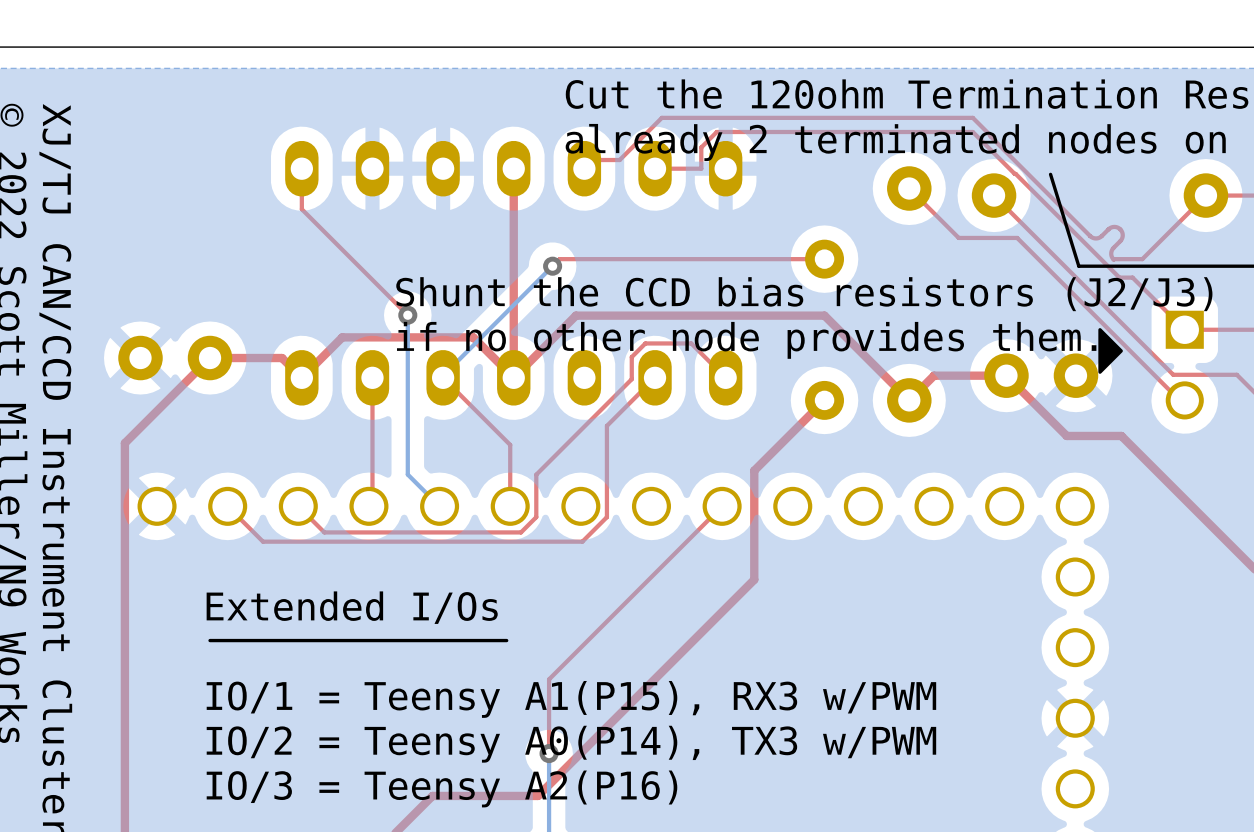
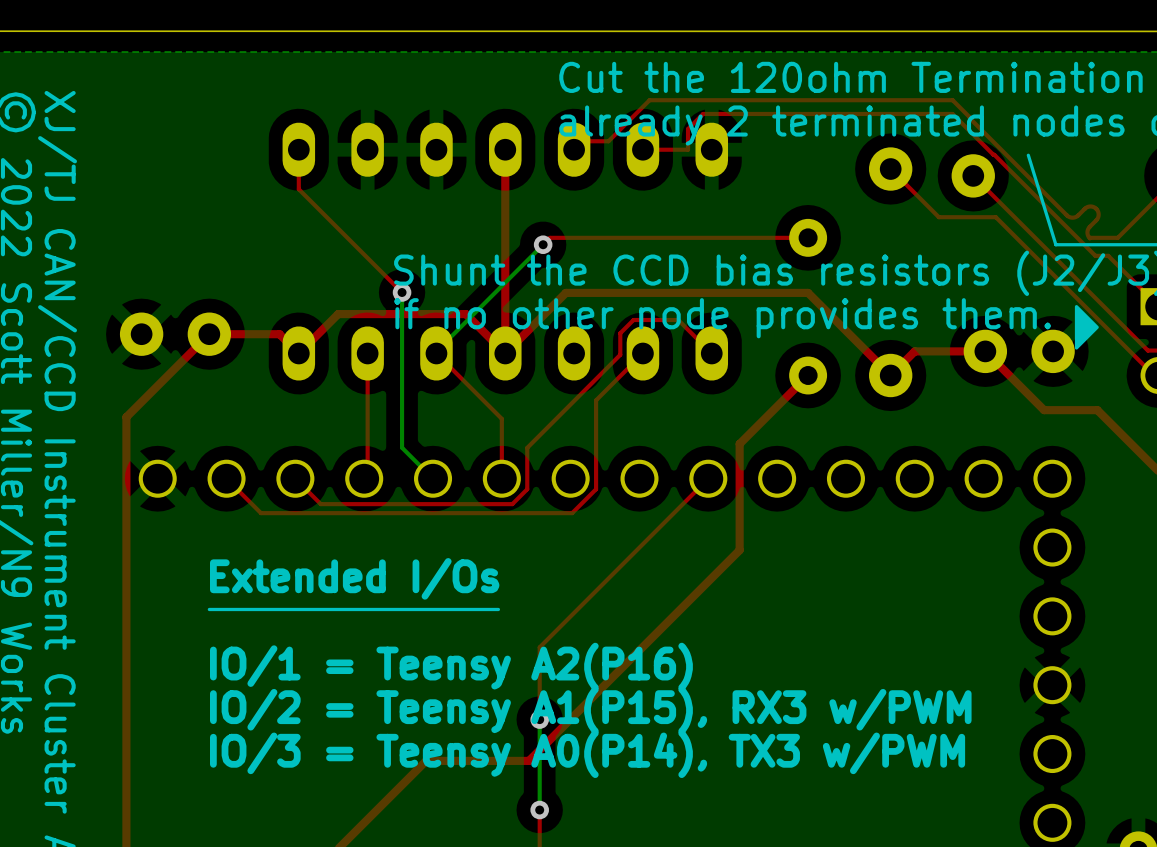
text: IO/1 = Teensy A1(P15), RX3 w/PWM (571, 699) -> IO/1 = Teensy A2(P16) (451, 666)
text: IO/2 = Teensy A0(P14), TX3 w/PWM (571, 744) -> IO/2 = Teensy A1(P15), RX3 w/PWM (590, 710)
text: IO/3 = Teensy A2(P16) (441, 788) -> IO/3 = Teensy A0(P14), TX3 w/PWM (587, 754)

